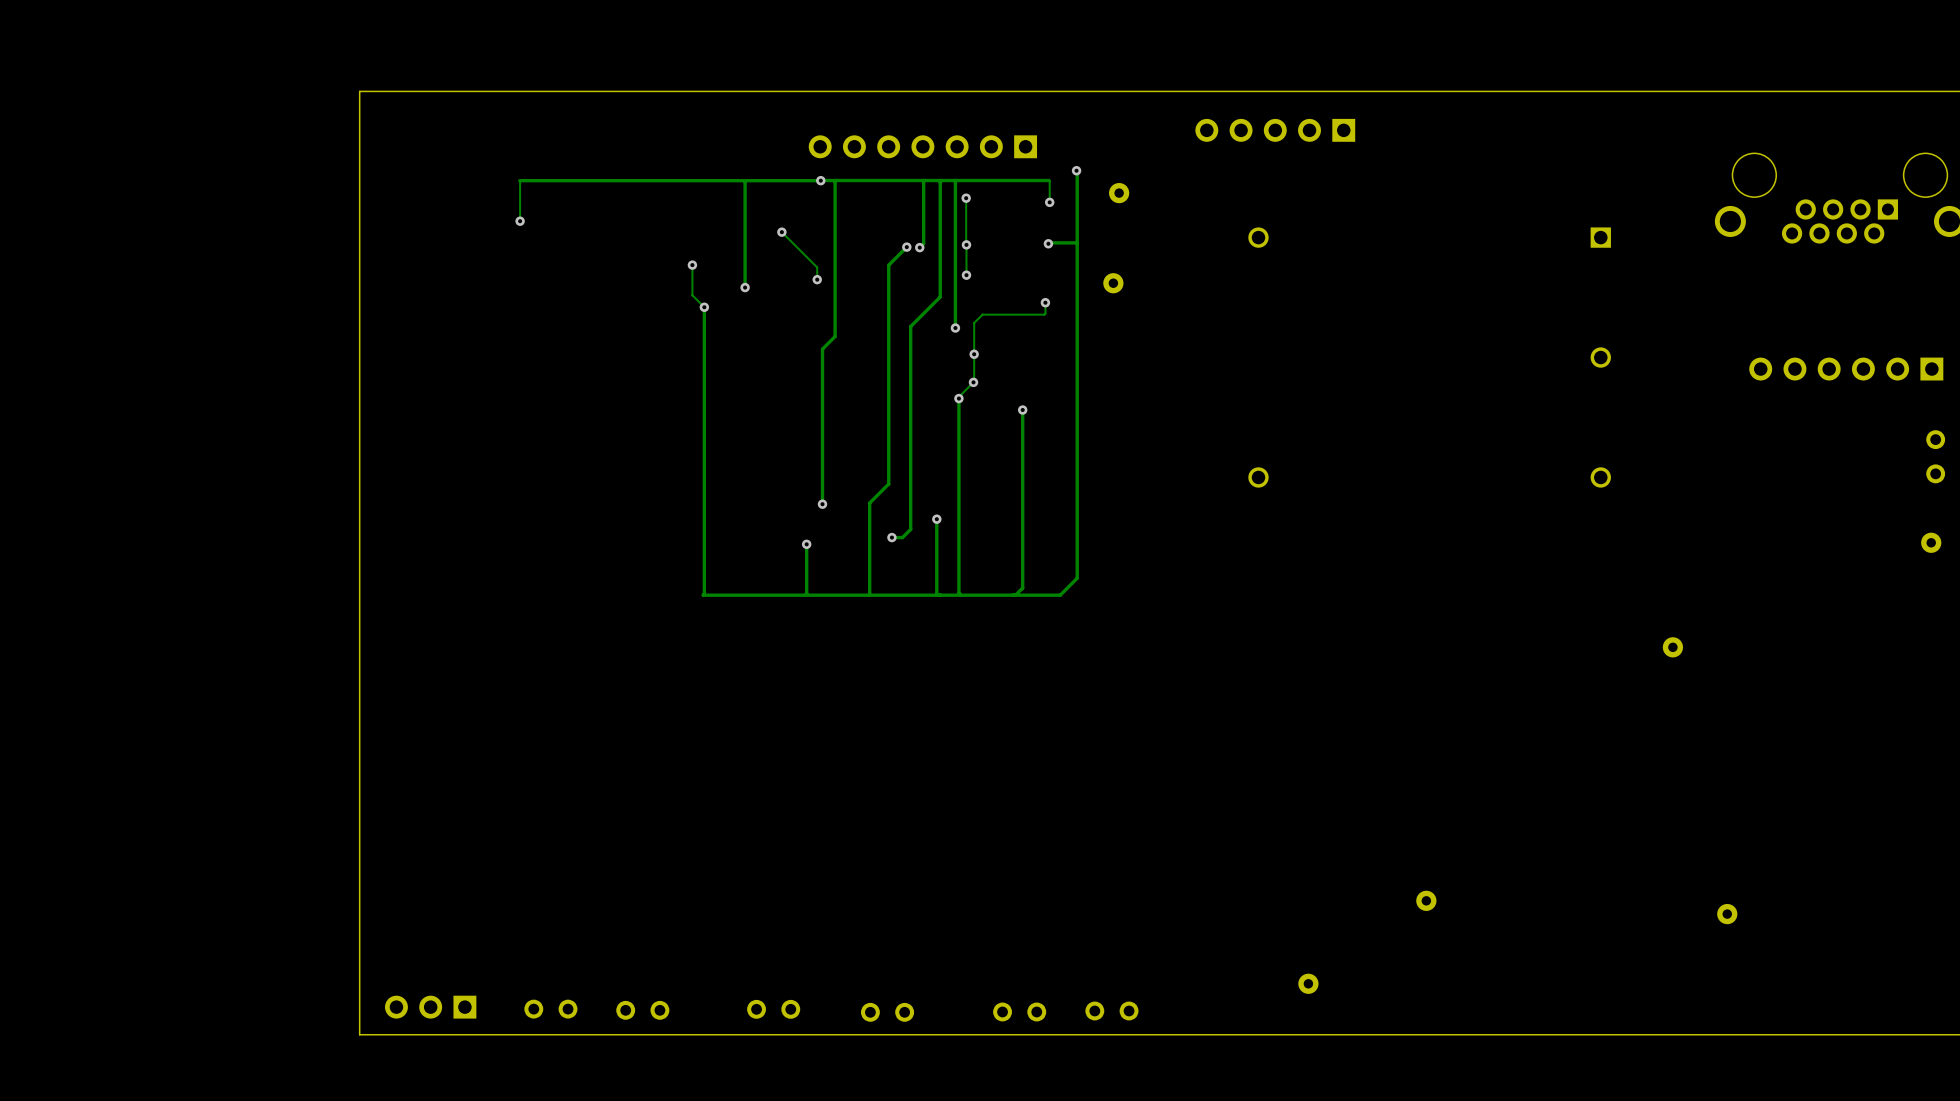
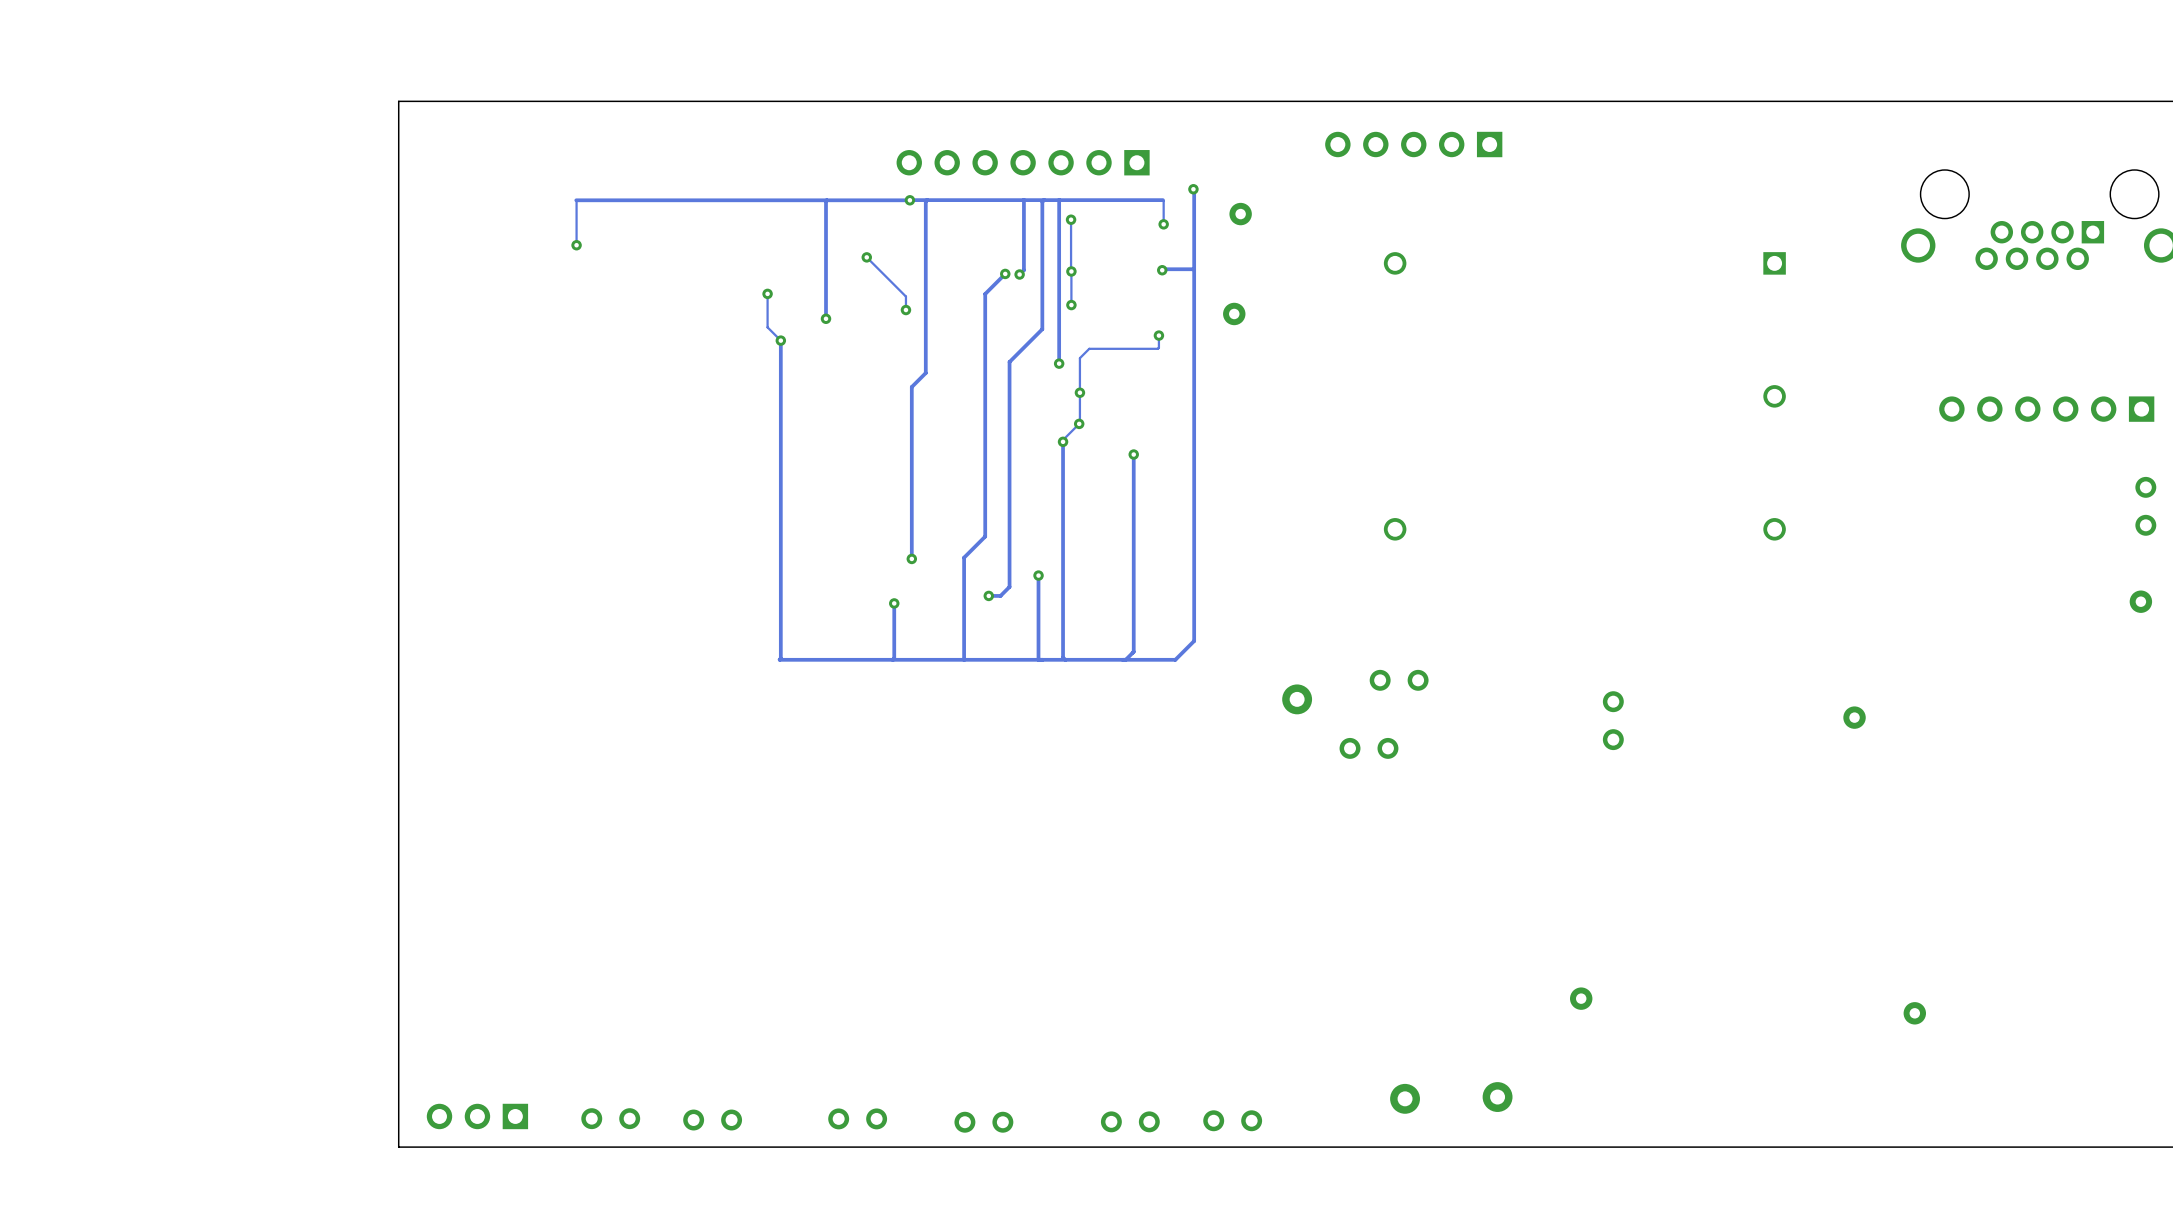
part: none -> (1399, 680)
part: none -> (1297, 699)
part: none -> (1613, 720)
part: none -> (1368, 748)
part: (1308, 983) -> none
part: none -> (1497, 1097)
part: none -> (1405, 1098)

